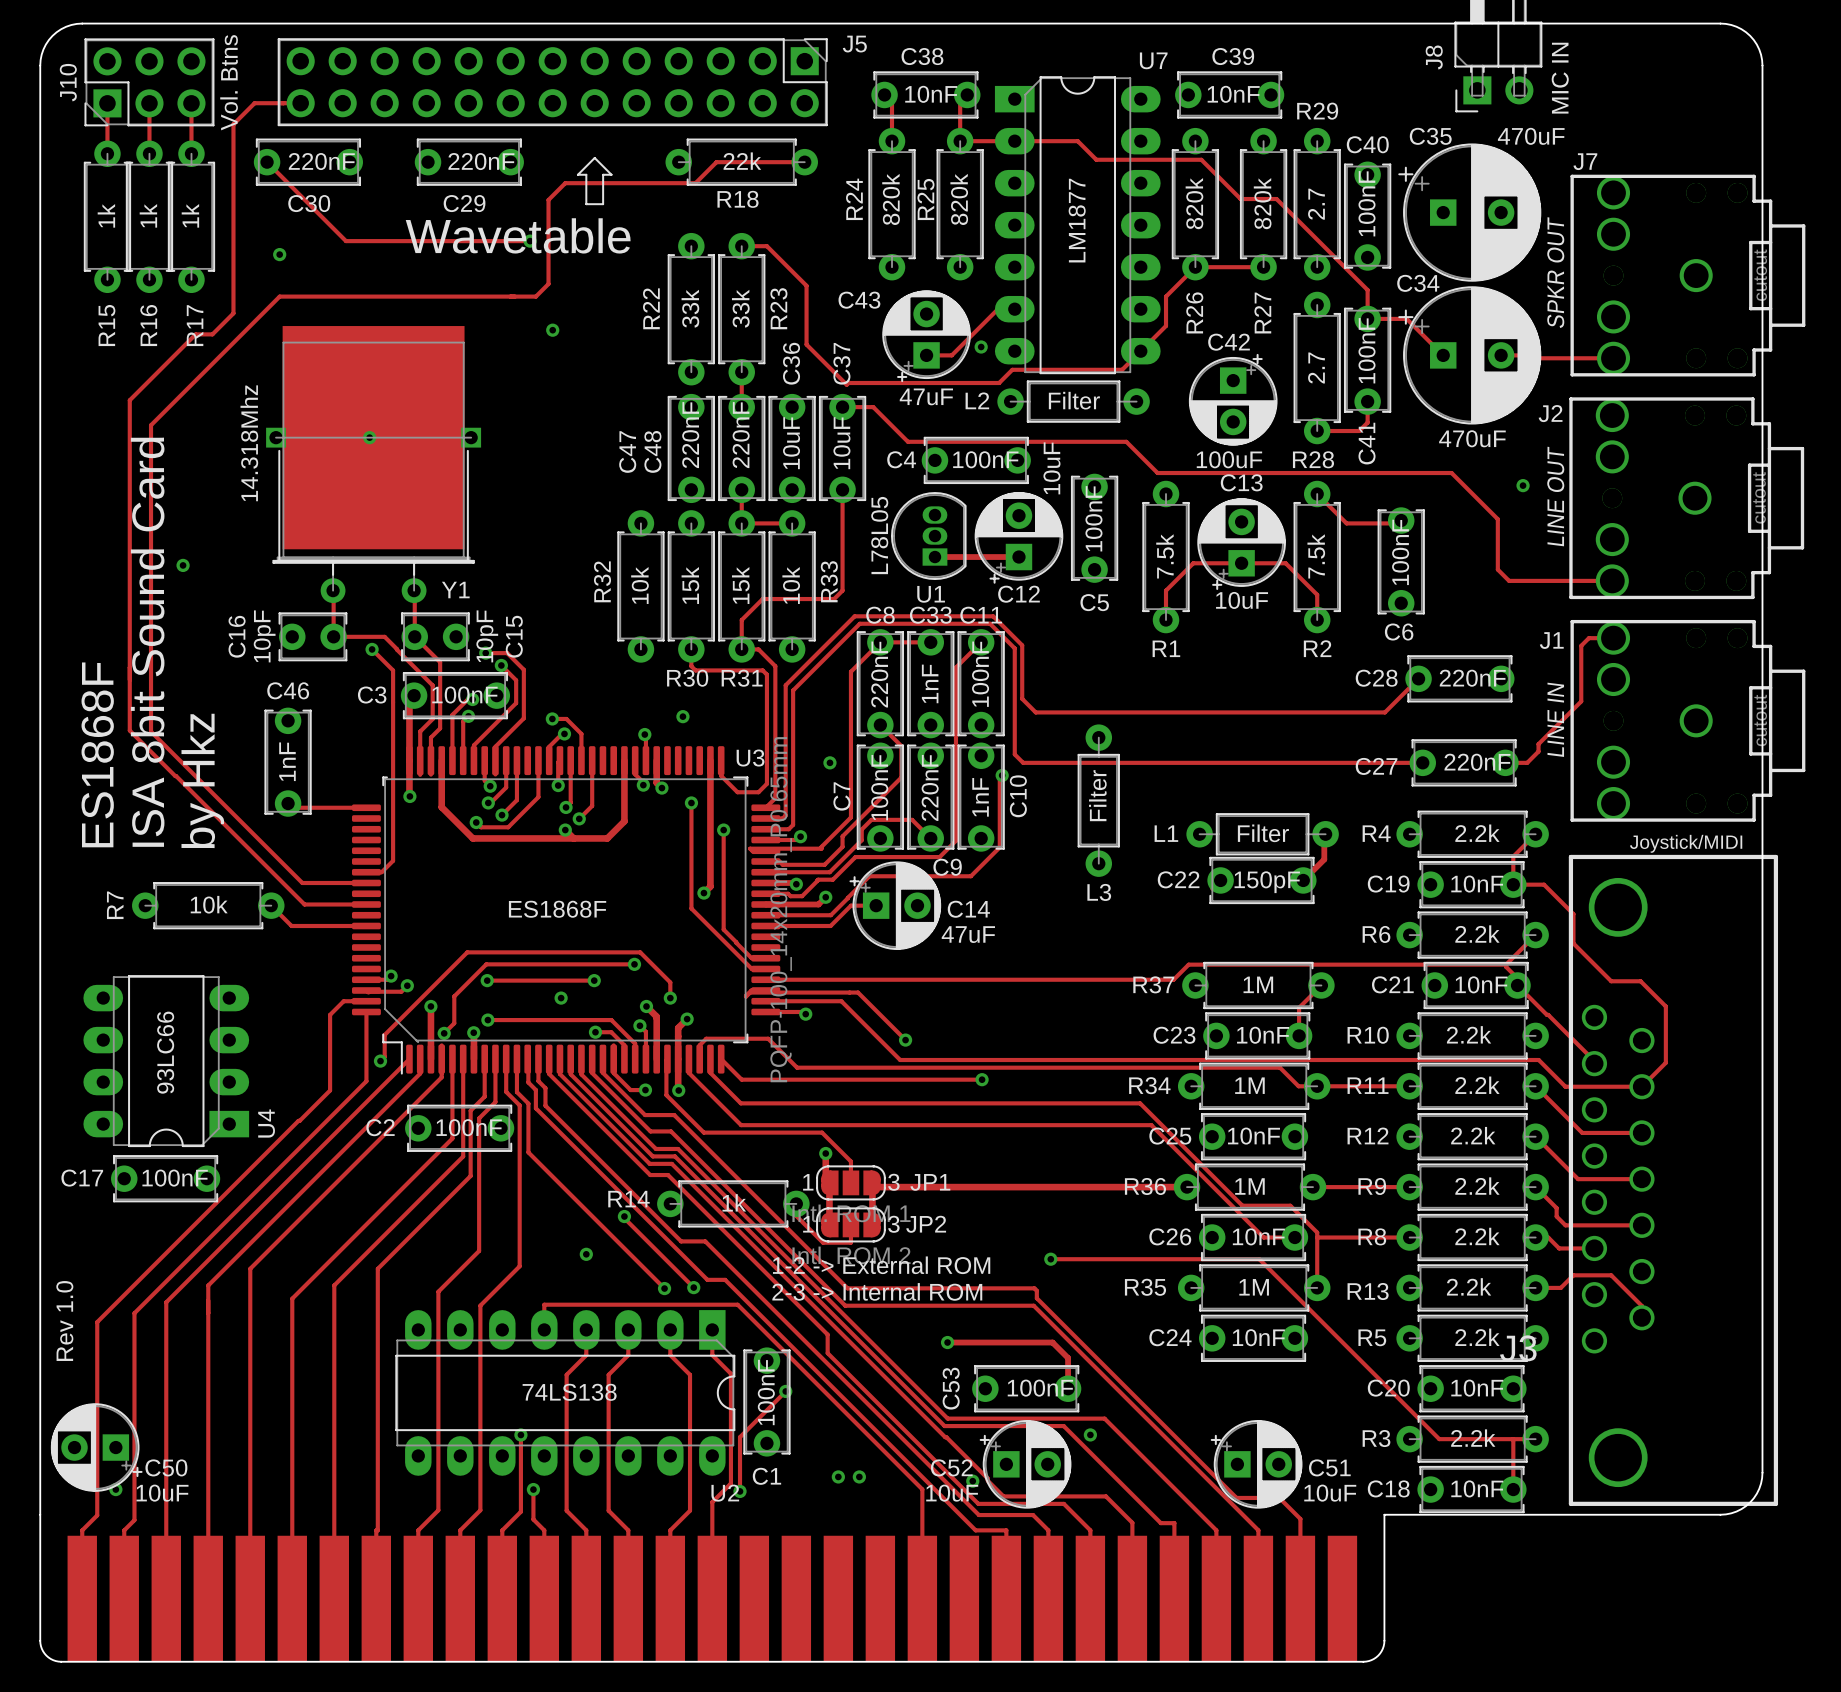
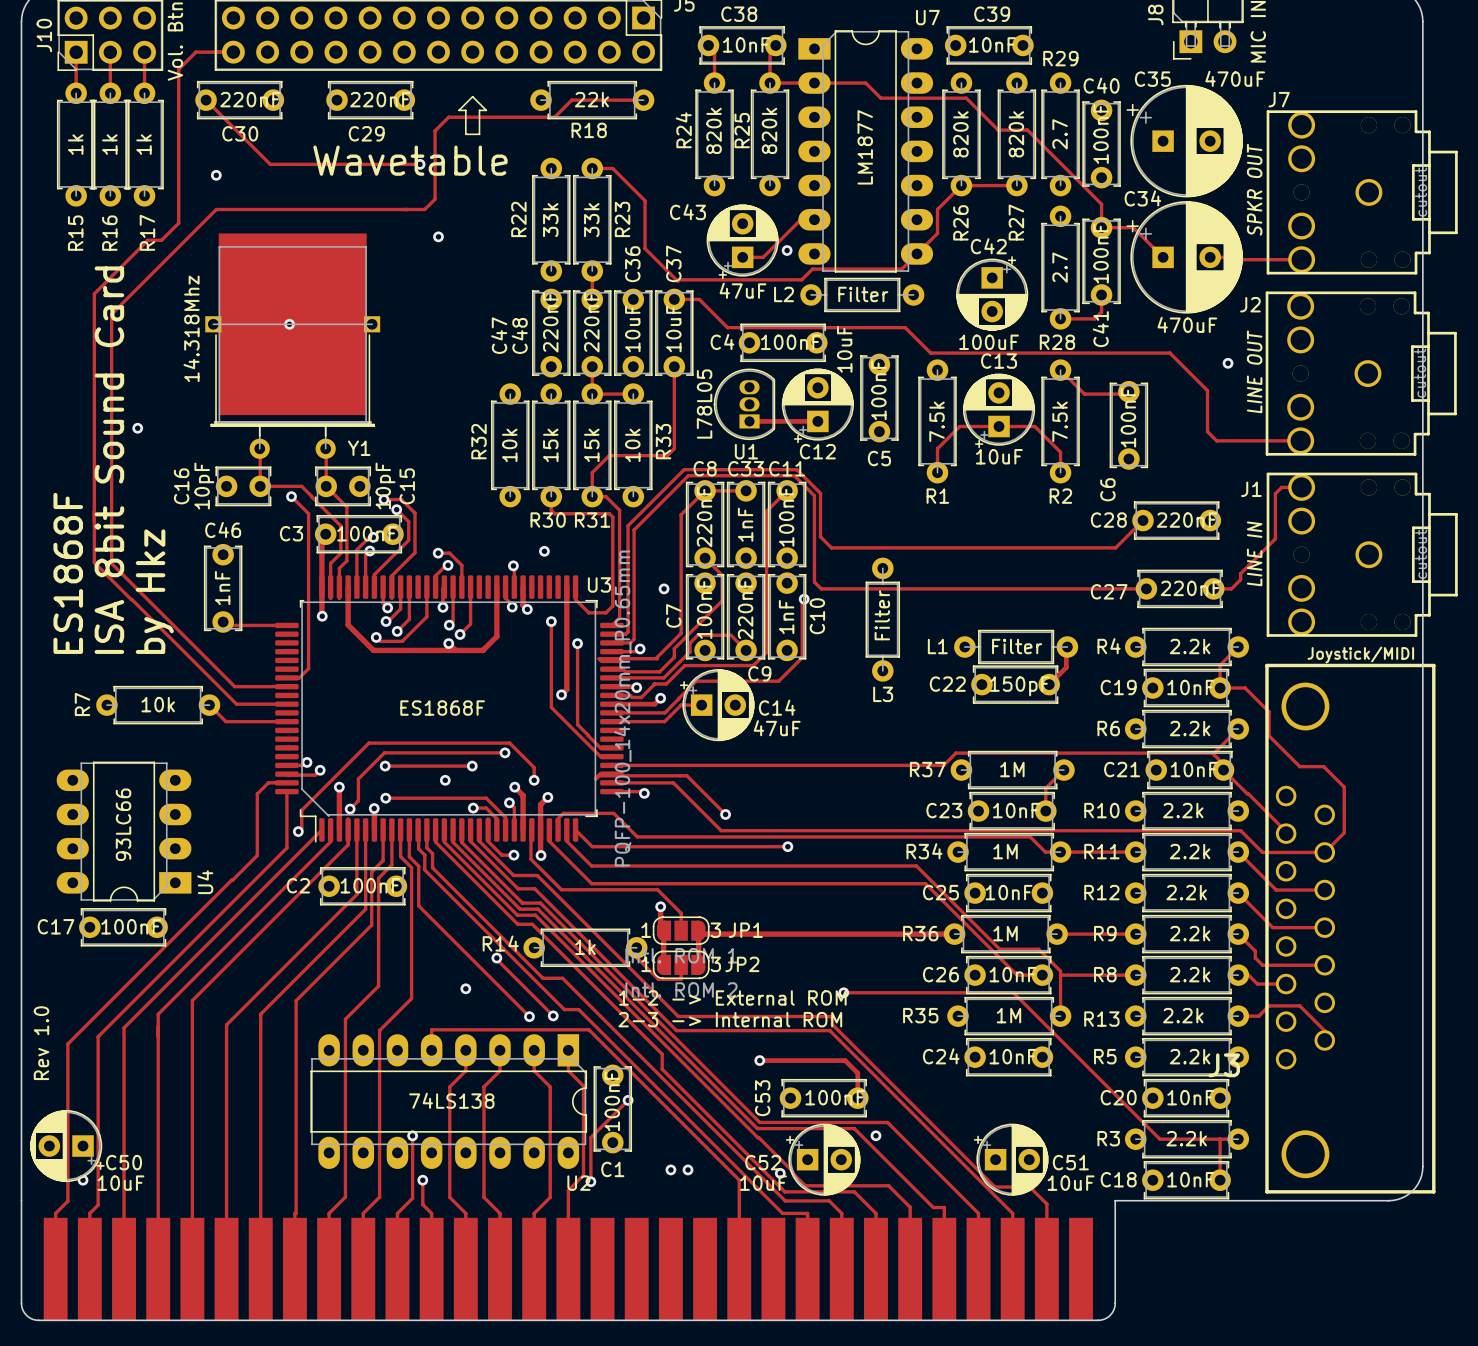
C6 name rotation: 0° (1399, 632) -> 90° counterclockwise (1107, 489)

